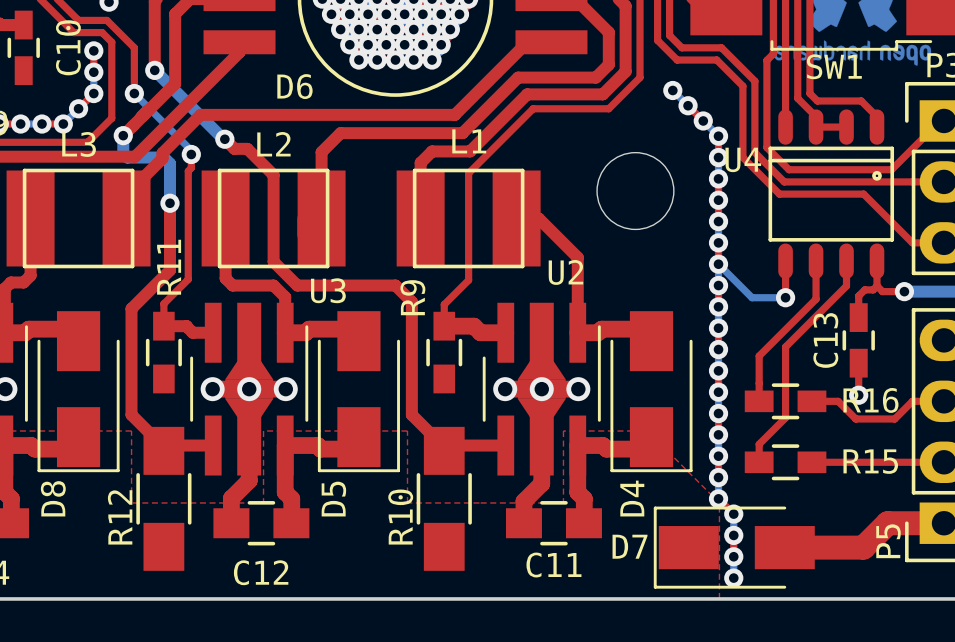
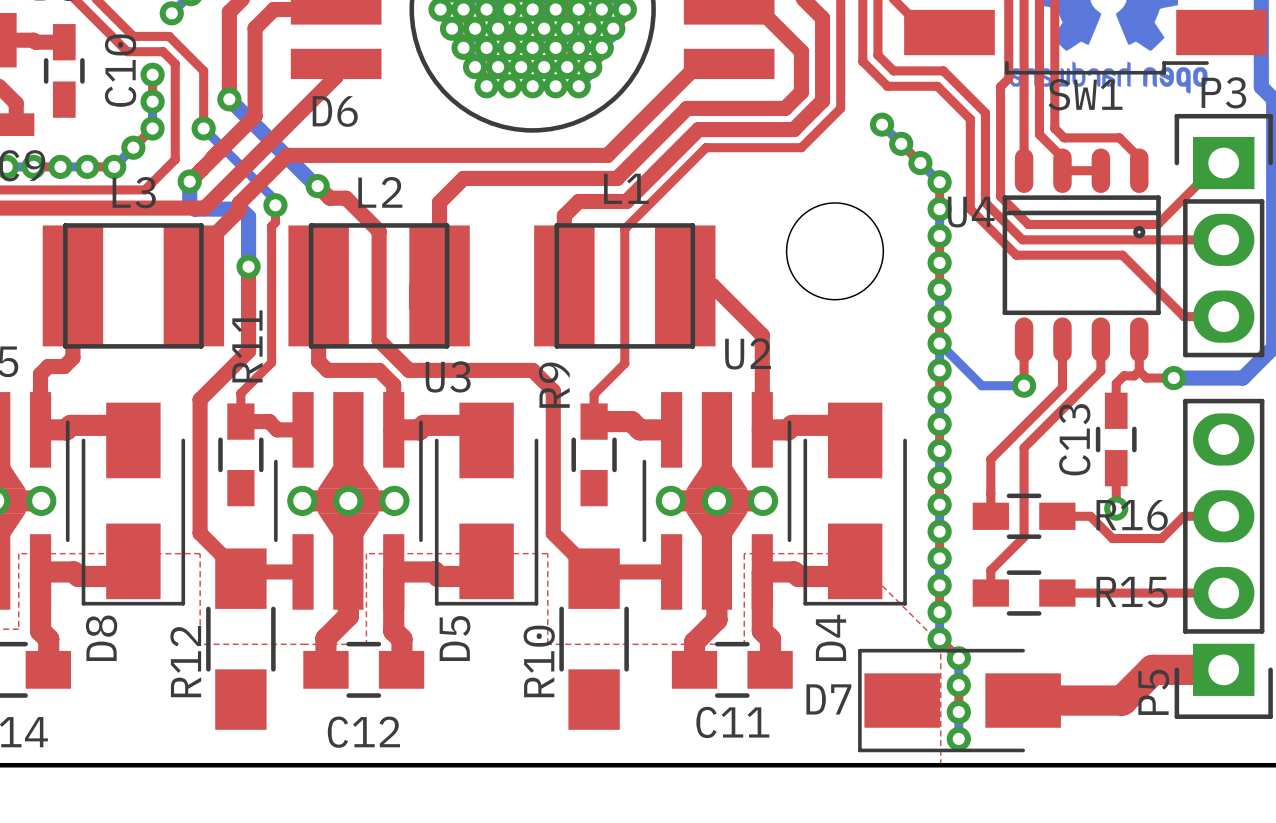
D6 name position: D6 (294, 86) -> D6 (335, 111)

